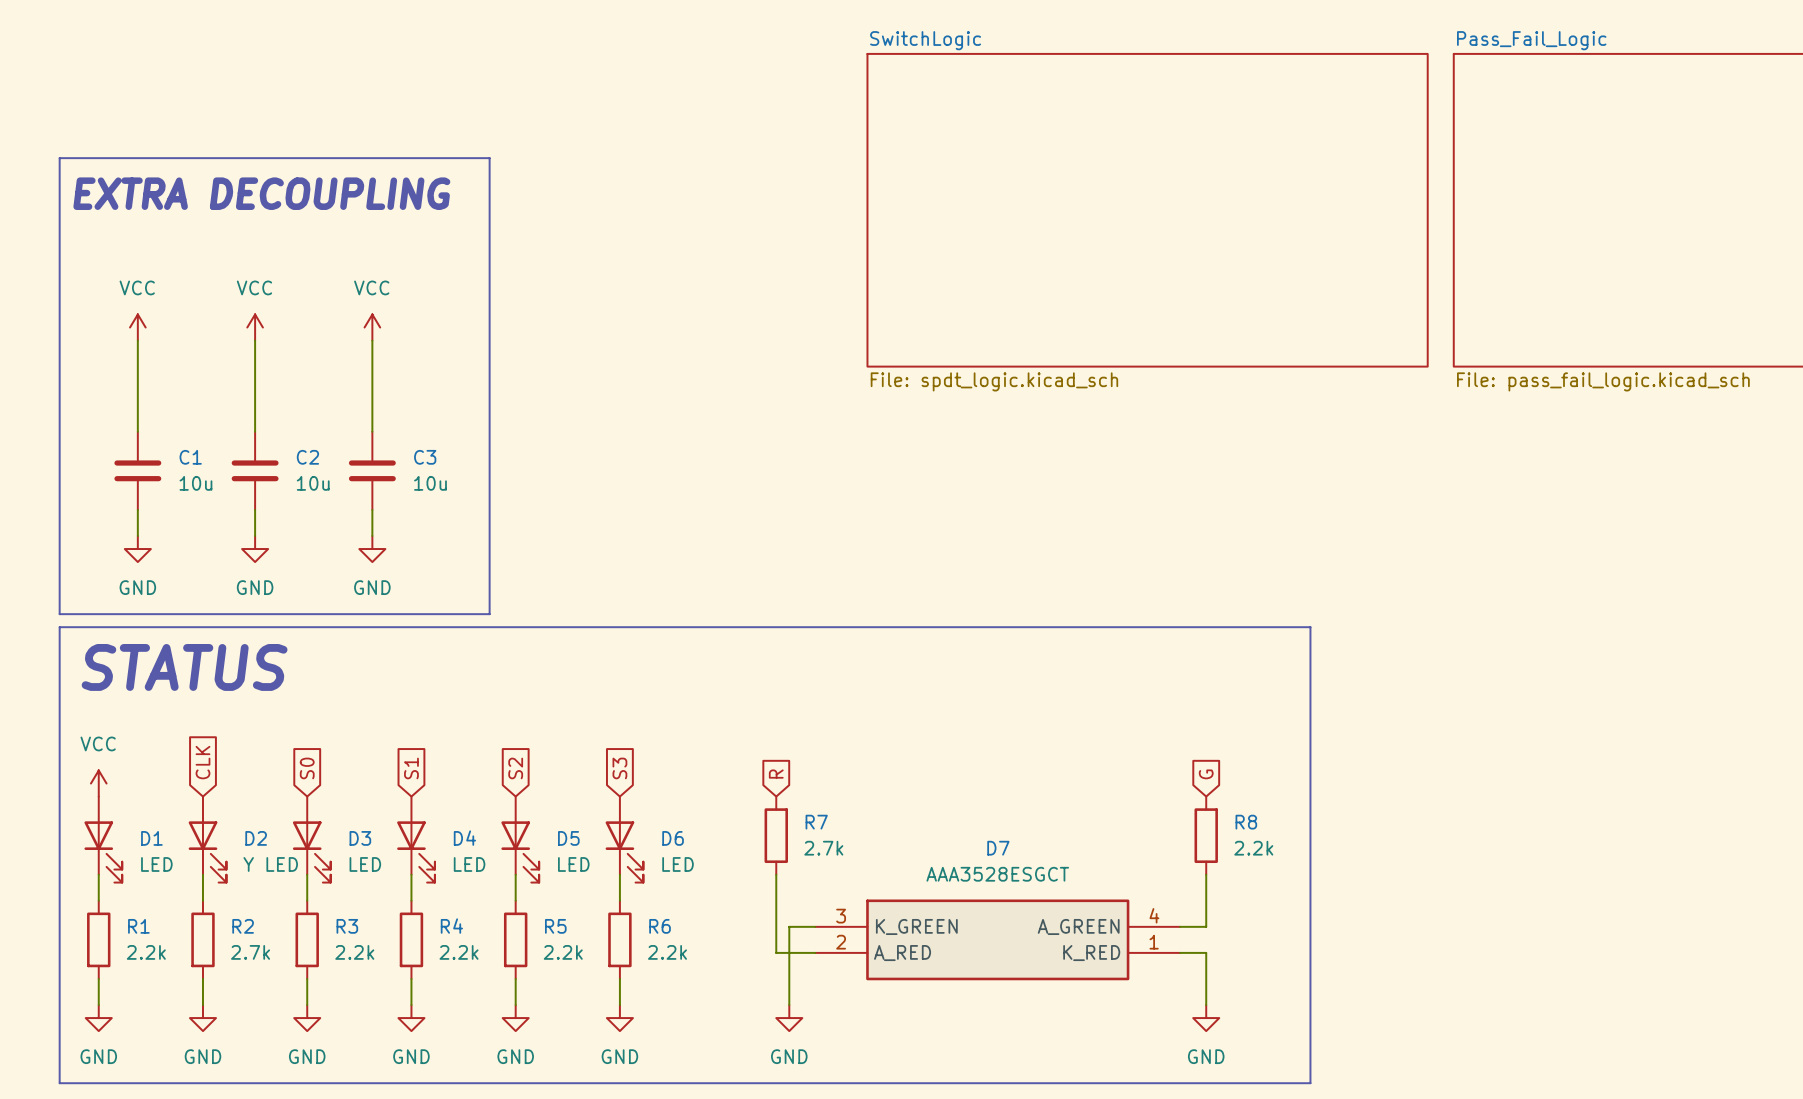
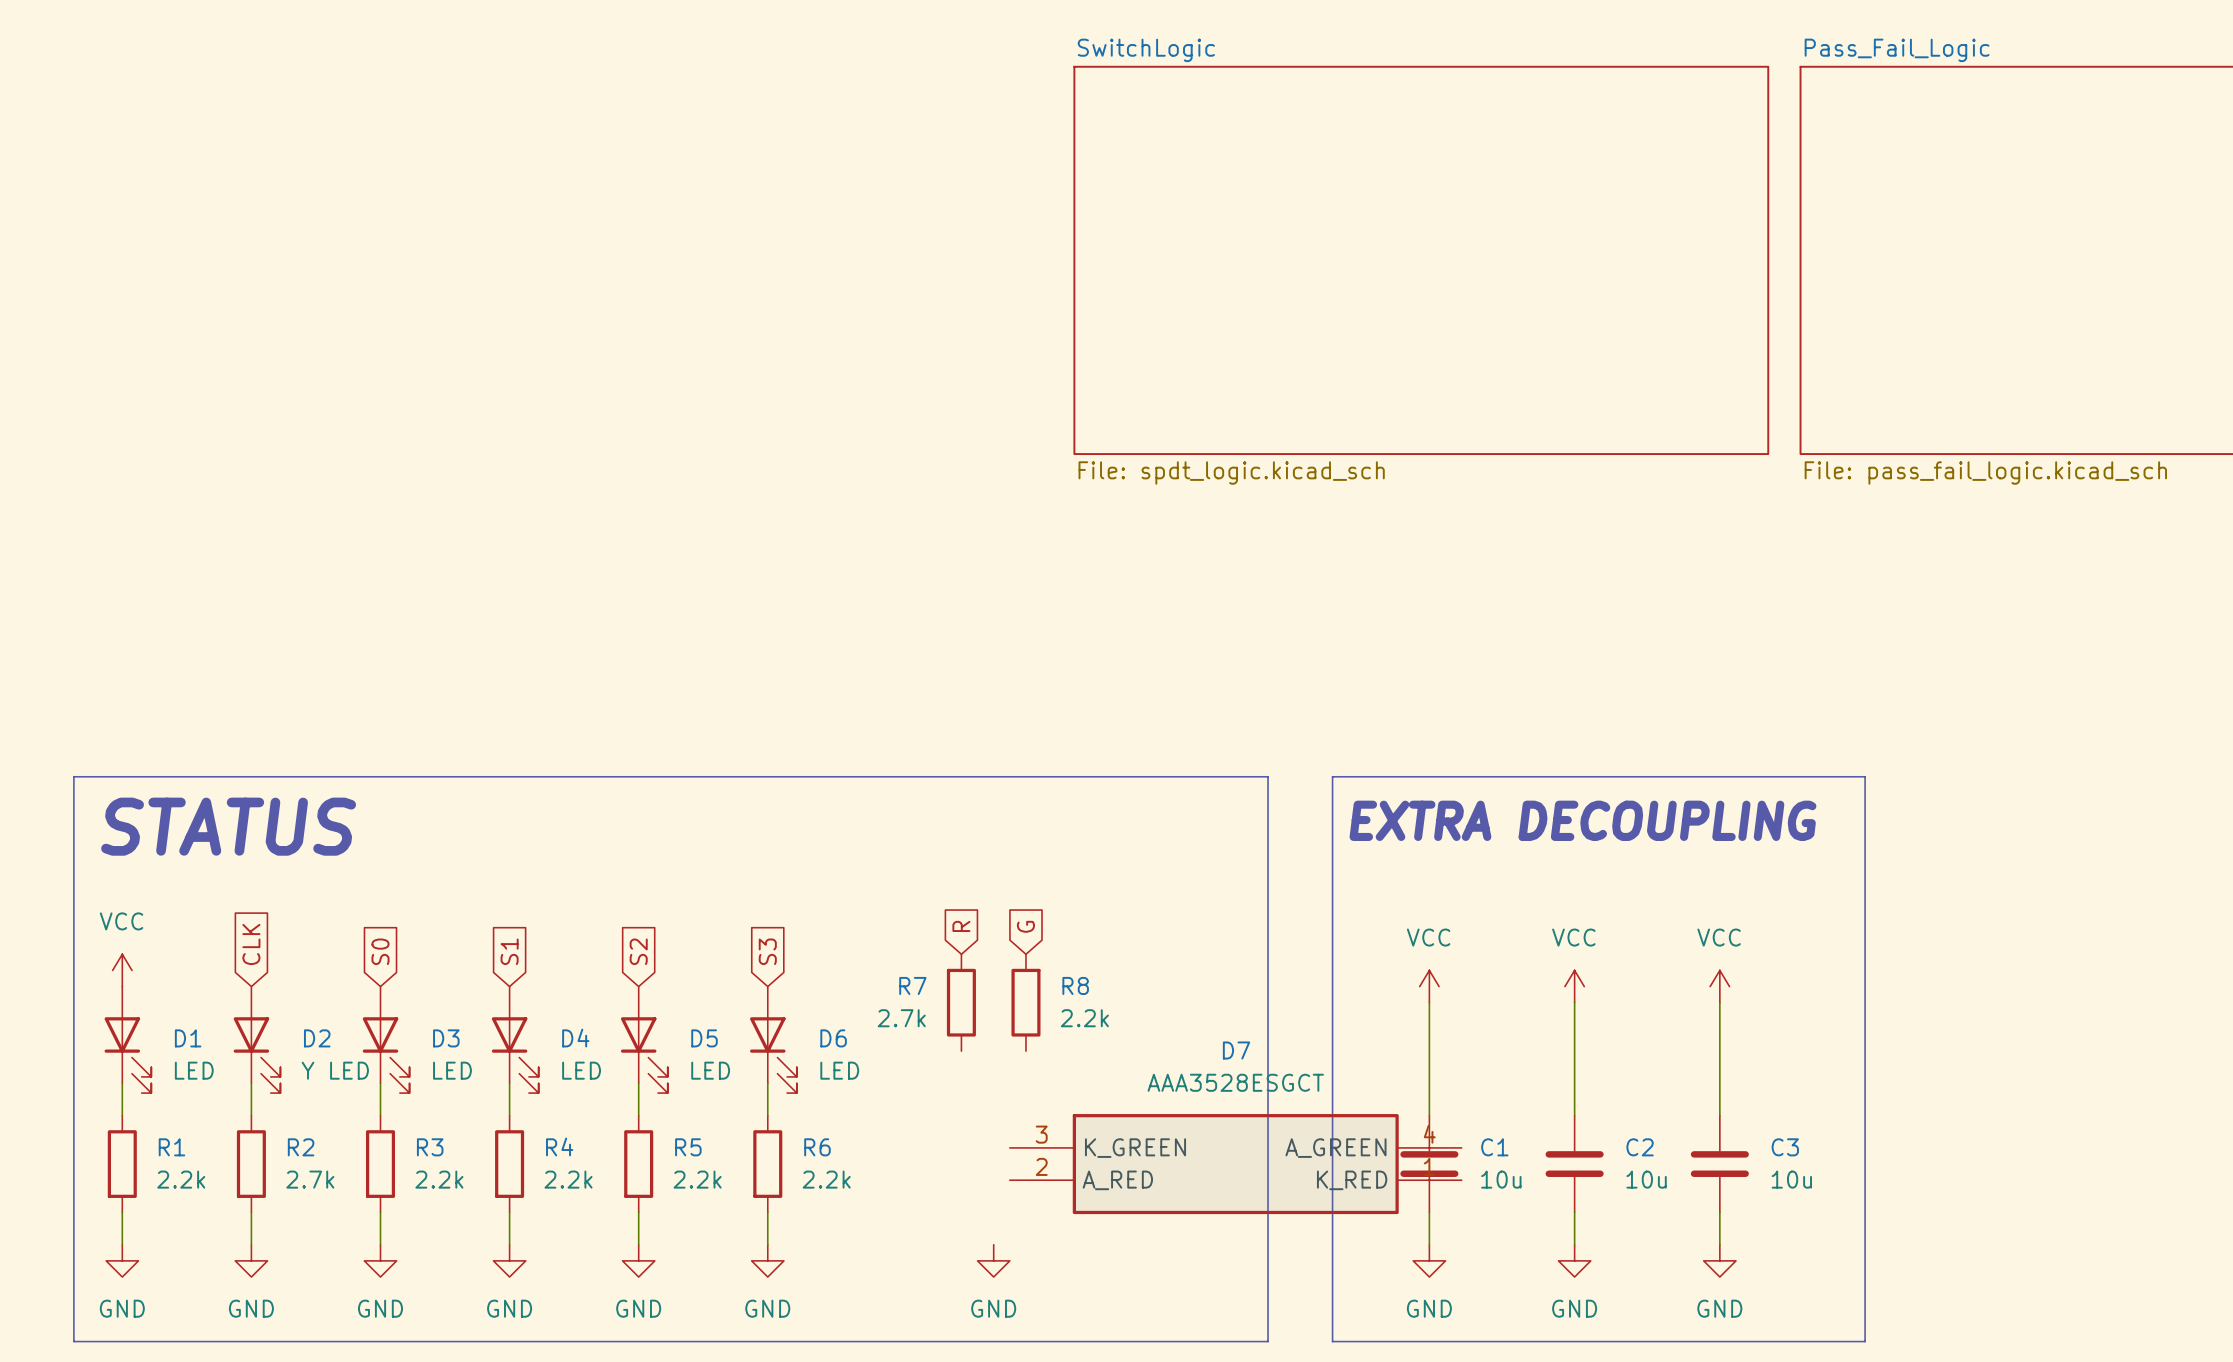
line: (59, 158) (489, 158) (489, 614) (59, 614) (59, 158) -> none
text: EXTRA DECOUPLING (261, 193) -> none
power symbol: VCC (137, 327) -> none
power symbol: VCC (255, 327) -> none
power symbol: VCC (372, 327) -> none
wire: (137, 340) (137, 431) -> none
wire: (255, 340) (255, 431) -> none
wire: (372, 340) (372, 431) -> none
C1 position: (137, 470) -> (1429, 1164)
C2 position: (255, 470) -> (1574, 1164)
C3 position: (372, 470) -> (1719, 1164)
wire: (137, 509) (137, 535) -> none
wire: (255, 509) (255, 535) -> none
wire: (372, 509) (372, 535) -> none
power symbol: GND (137, 549) -> none
power symbol: GND (255, 549) -> none
power symbol: GND (372, 549) -> none
line: (1023, 627) (1075, 627) -> (1268, 776) (1268, 1341)
line: (1310, 627) (1310, 1083) -> (1623, 776) (1865, 776) (1865, 1341) (1623, 1341)
text: none -> EXTRA DECOUPLING (1582, 820)
global label: none -> G (1025, 926)
global label position: R (776, 774) -> R (961, 926)
global label: G (1206, 774) -> none
power symbol: none -> VCC (1429, 986)
power symbol: none -> VCC (1574, 986)
power symbol: none -> VCC (1719, 986)
wire: none -> (1429, 1002) (1429, 1115)
wire: none -> (1574, 1002) (1574, 1115)
wire: none -> (1719, 1002) (1719, 1115)
R7 name position: R7 (816, 822) -> R7 (912, 985)
R7 position: (776, 835) -> (961, 1002)
R8 position: (1206, 835) -> (1025, 1002)
R7 value position: 2.7k (823, 848) -> 2.7k (901, 1018)
wire: (776, 874) (776, 952) (815, 952) -> none
wire: (1206, 874) (1206, 926) (1180, 926) -> none
wire: (815, 926) (789, 926) (789, 1005) -> none
wire: (1180, 952) (1206, 952) (1206, 1005) -> none
wire: none -> (1429, 1212) (1429, 1244)
wire: none -> (1574, 1212) (1574, 1244)
wire: none -> (1719, 1212) (1719, 1244)
power symbol position: GND (789, 1018) -> GND (993, 1260)
power symbol: none -> GND (1429, 1260)
power symbol: GND (1206, 1018) -> none
power symbol: none -> GND (1574, 1260)
power symbol: none -> GND (1719, 1260)
line: (1023, 1083) (1075, 1083) -> (1332, 776) (1332, 1341)

